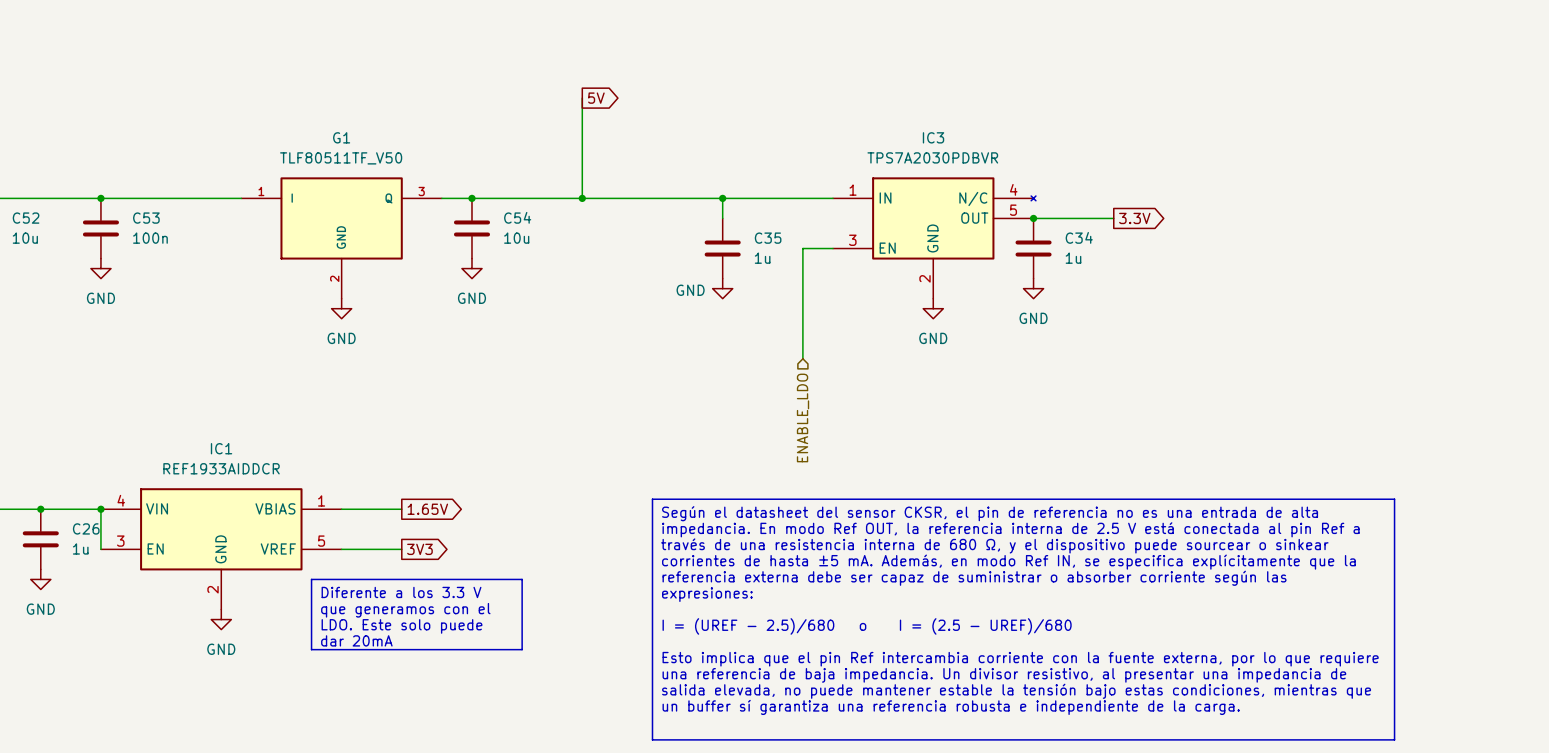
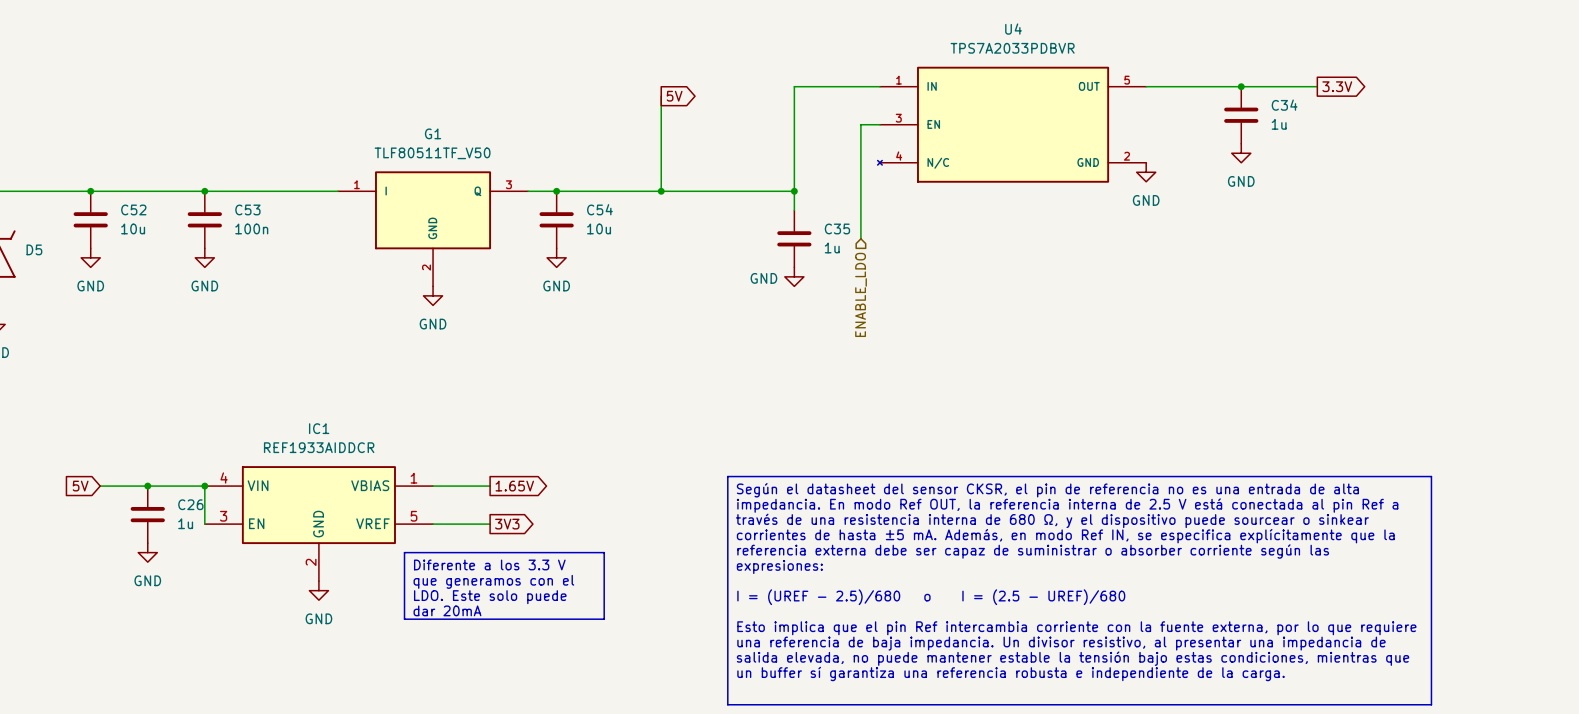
wire: none -> (1146, 86) (1317, 86)
junction: none -> (1241, 86)
global label: none -> 3.3V (1337, 86)
wire: none -> (879, 124) (860, 124) (860, 238)
U4: none -> TPS7A2033PDBVR (1011, 124)
power symbol: none -> GND (1241, 153)
power symbol: none -> GND (1146, 172)
wire: (722, 198) (832, 198) -> (794, 191) (794, 86) (879, 86)
wire: (1033, 218) (1113, 218) -> none
junction: (1033, 218) -> none
global label: 3.3V (1134, 218) -> none
IC3: TPS7A2030PDBVR (934, 238) -> none
wire: (832, 248) (802, 248) (802, 358) -> none
C34 position: (1033, 248) -> (1241, 115)
power symbol: GND (1033, 288) -> none
power symbol: GND (933, 308) -> none
hierarchical label position: ENABLE_LDO (803, 417) -> ENABLE_LDO (861, 294)

